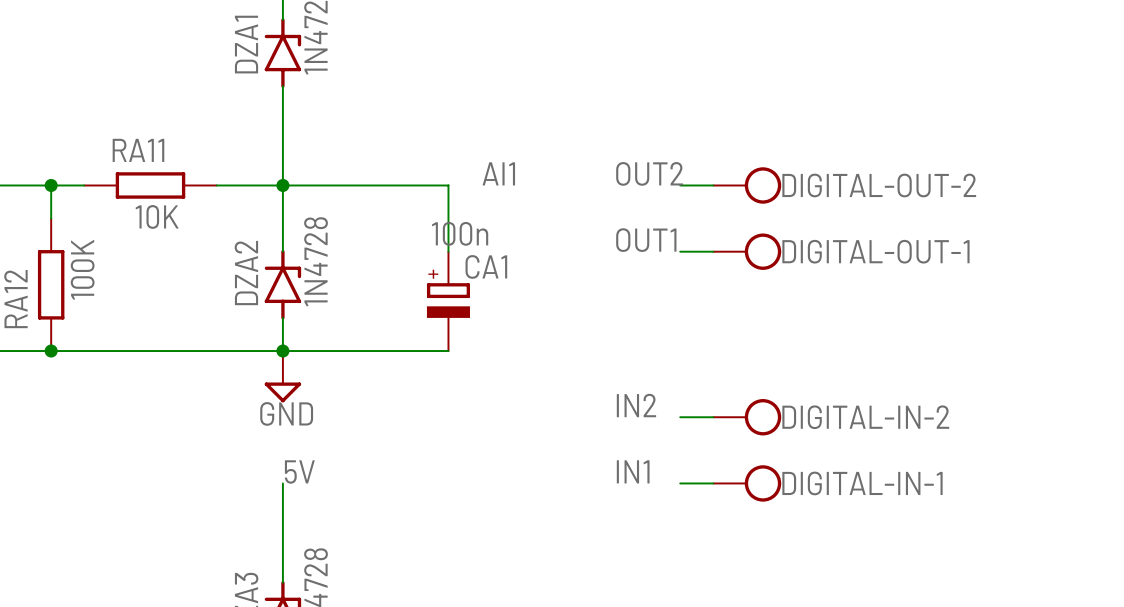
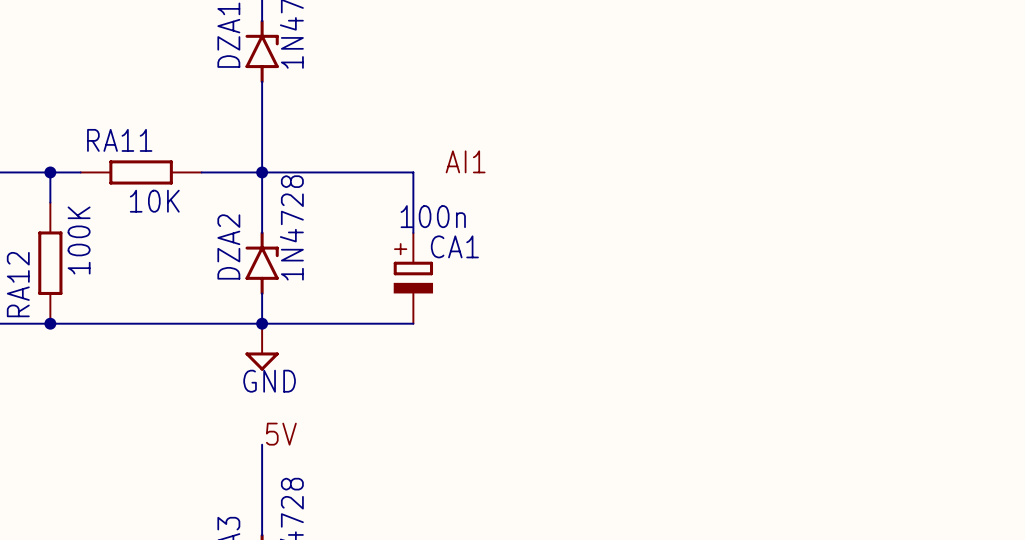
label: OUT2 (649, 173) -> none
wire: (680, 185) (713, 185) -> none
DIGITAL-OUT-2: (747, 185) -> none
label: OUT1 (646, 240) -> none
wire: (680, 251) (713, 251) -> none
DIGITAL-OUT-1: (747, 251) -> none
label: IN2 (636, 405) -> none
wire: (680, 417) (713, 417) -> none
DIGITAL-IN-2: (747, 417) -> none
label: IN1 (633, 471) -> none
wire: (680, 483) (713, 483) -> none
DIGITAL-IN-1: (747, 483) -> none

